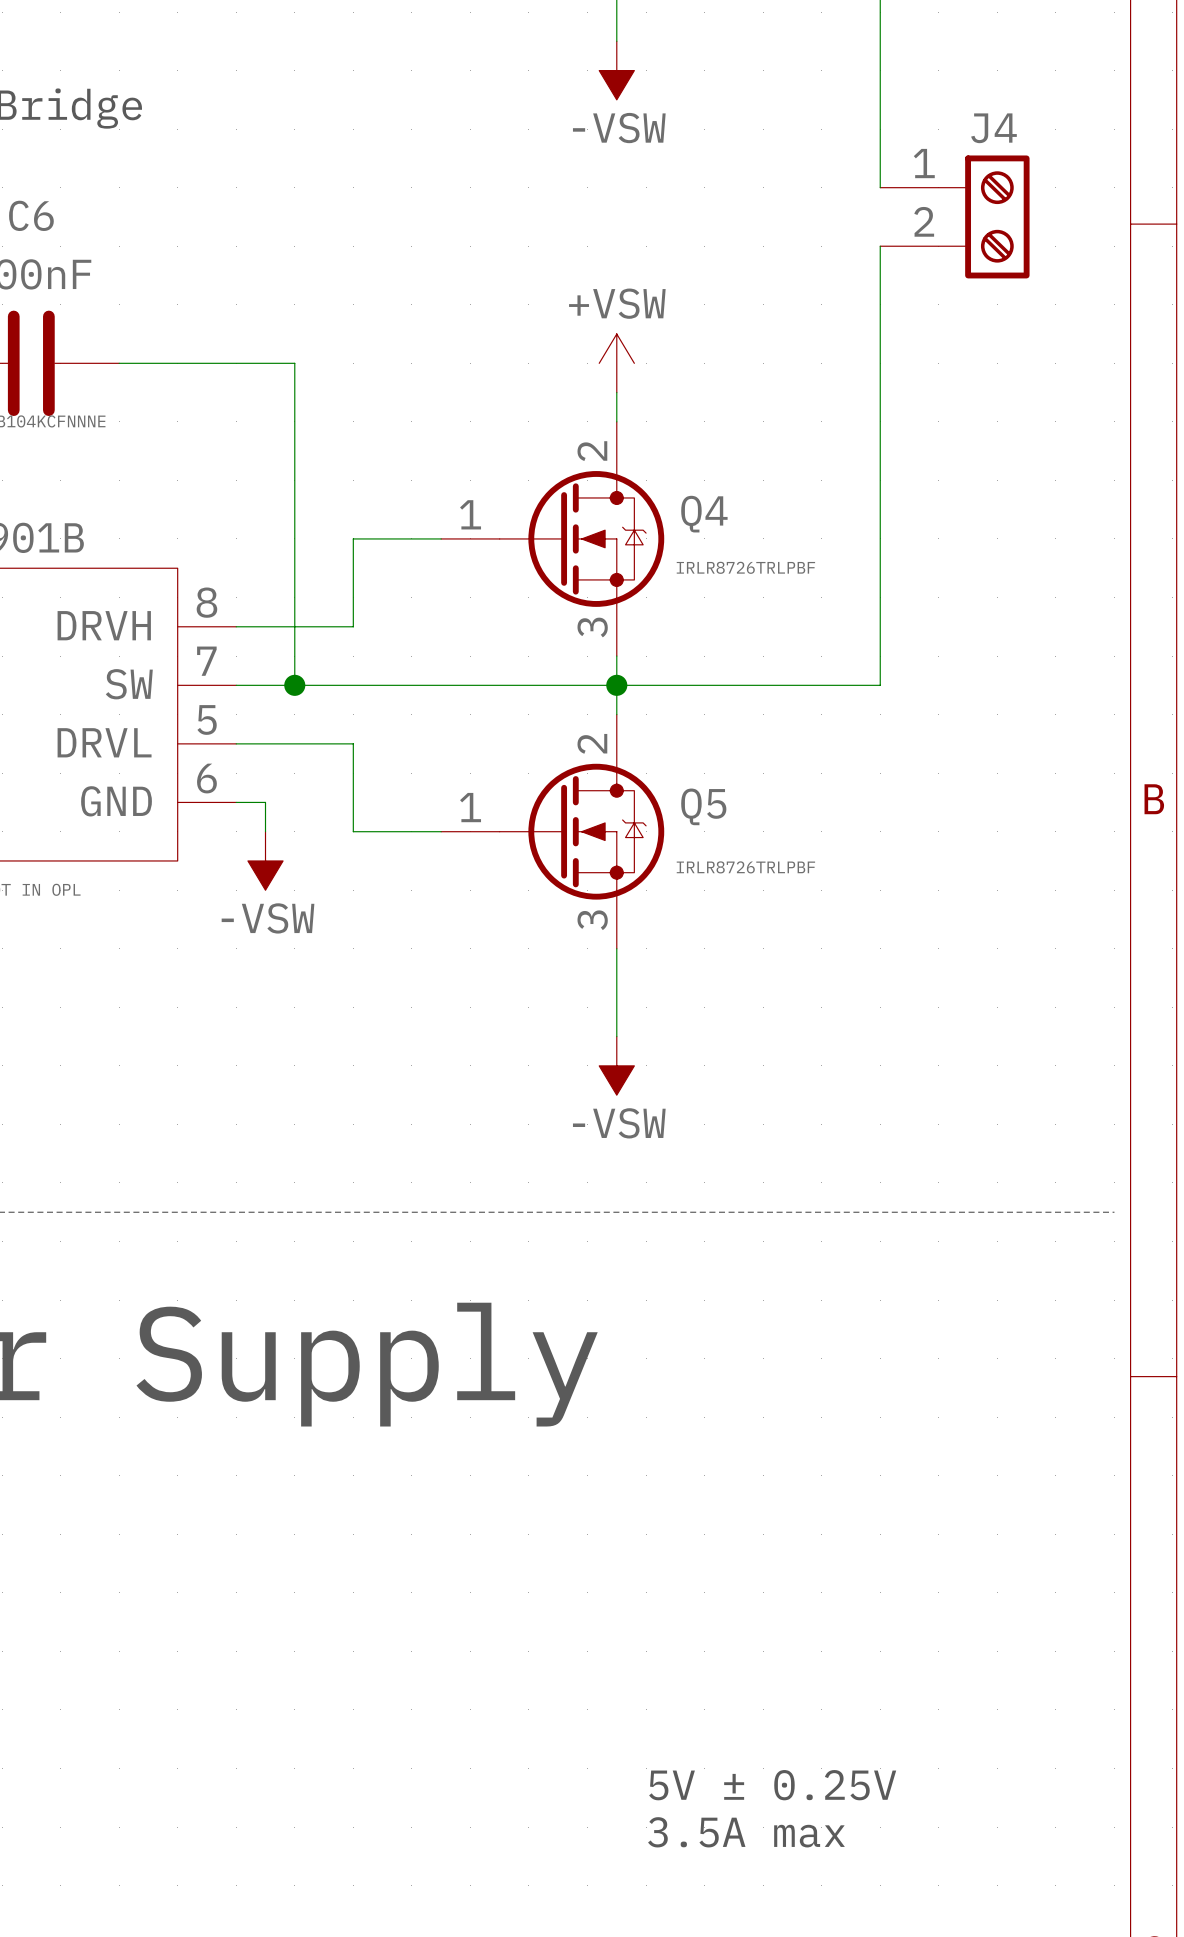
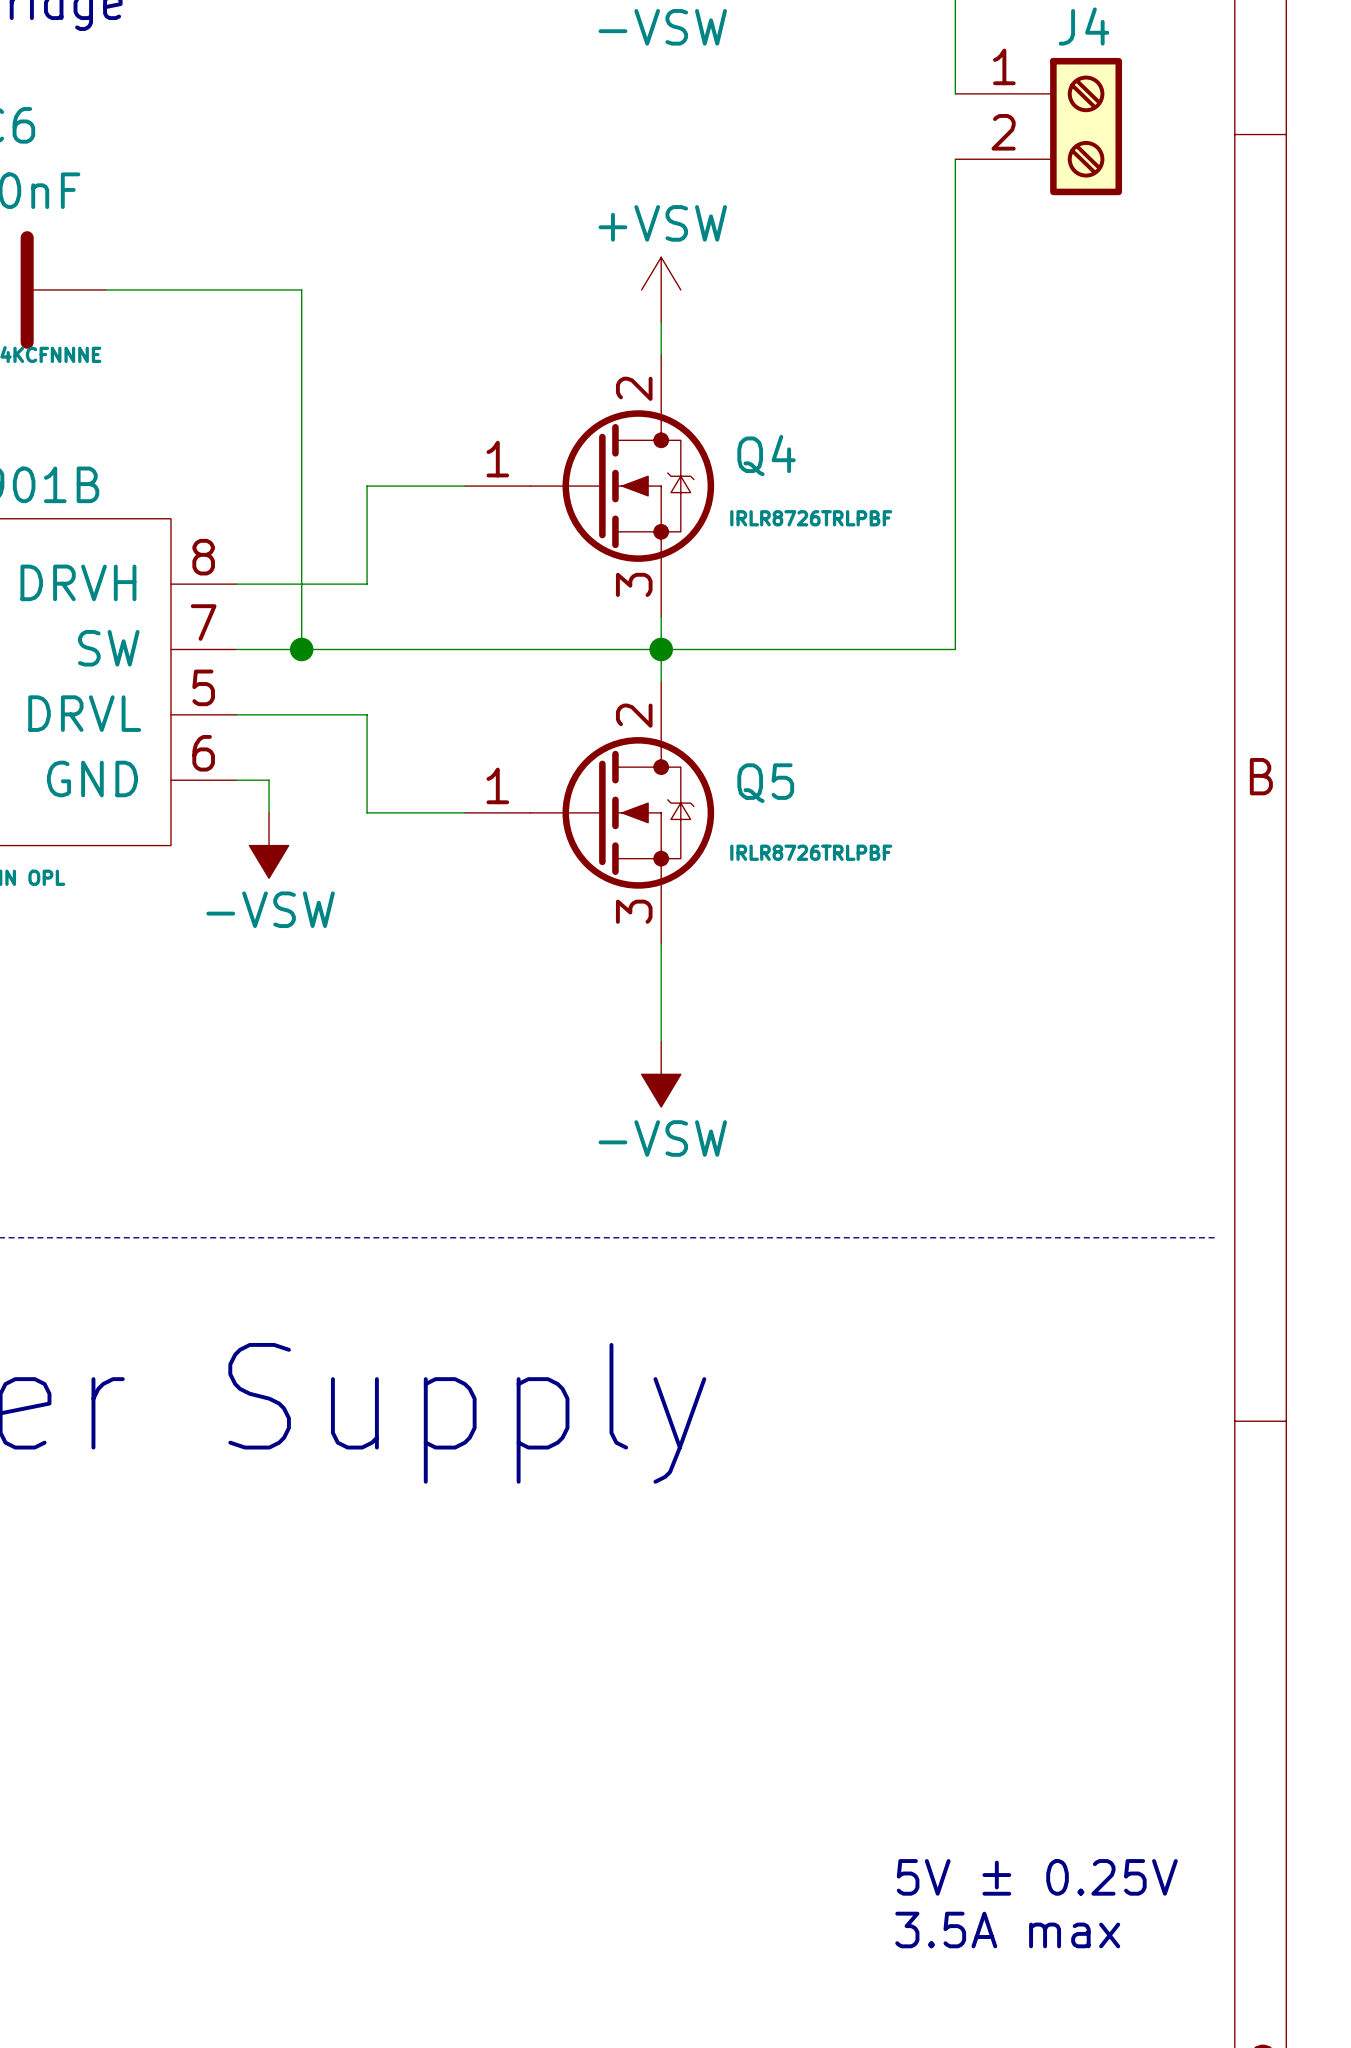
text position: 5V ± 0.25V (772, 1785) -> 5V ± 0.25V (1037, 1877)
text position: 3.5A max (746, 1832) -> 3.5A max (1007, 1930)

